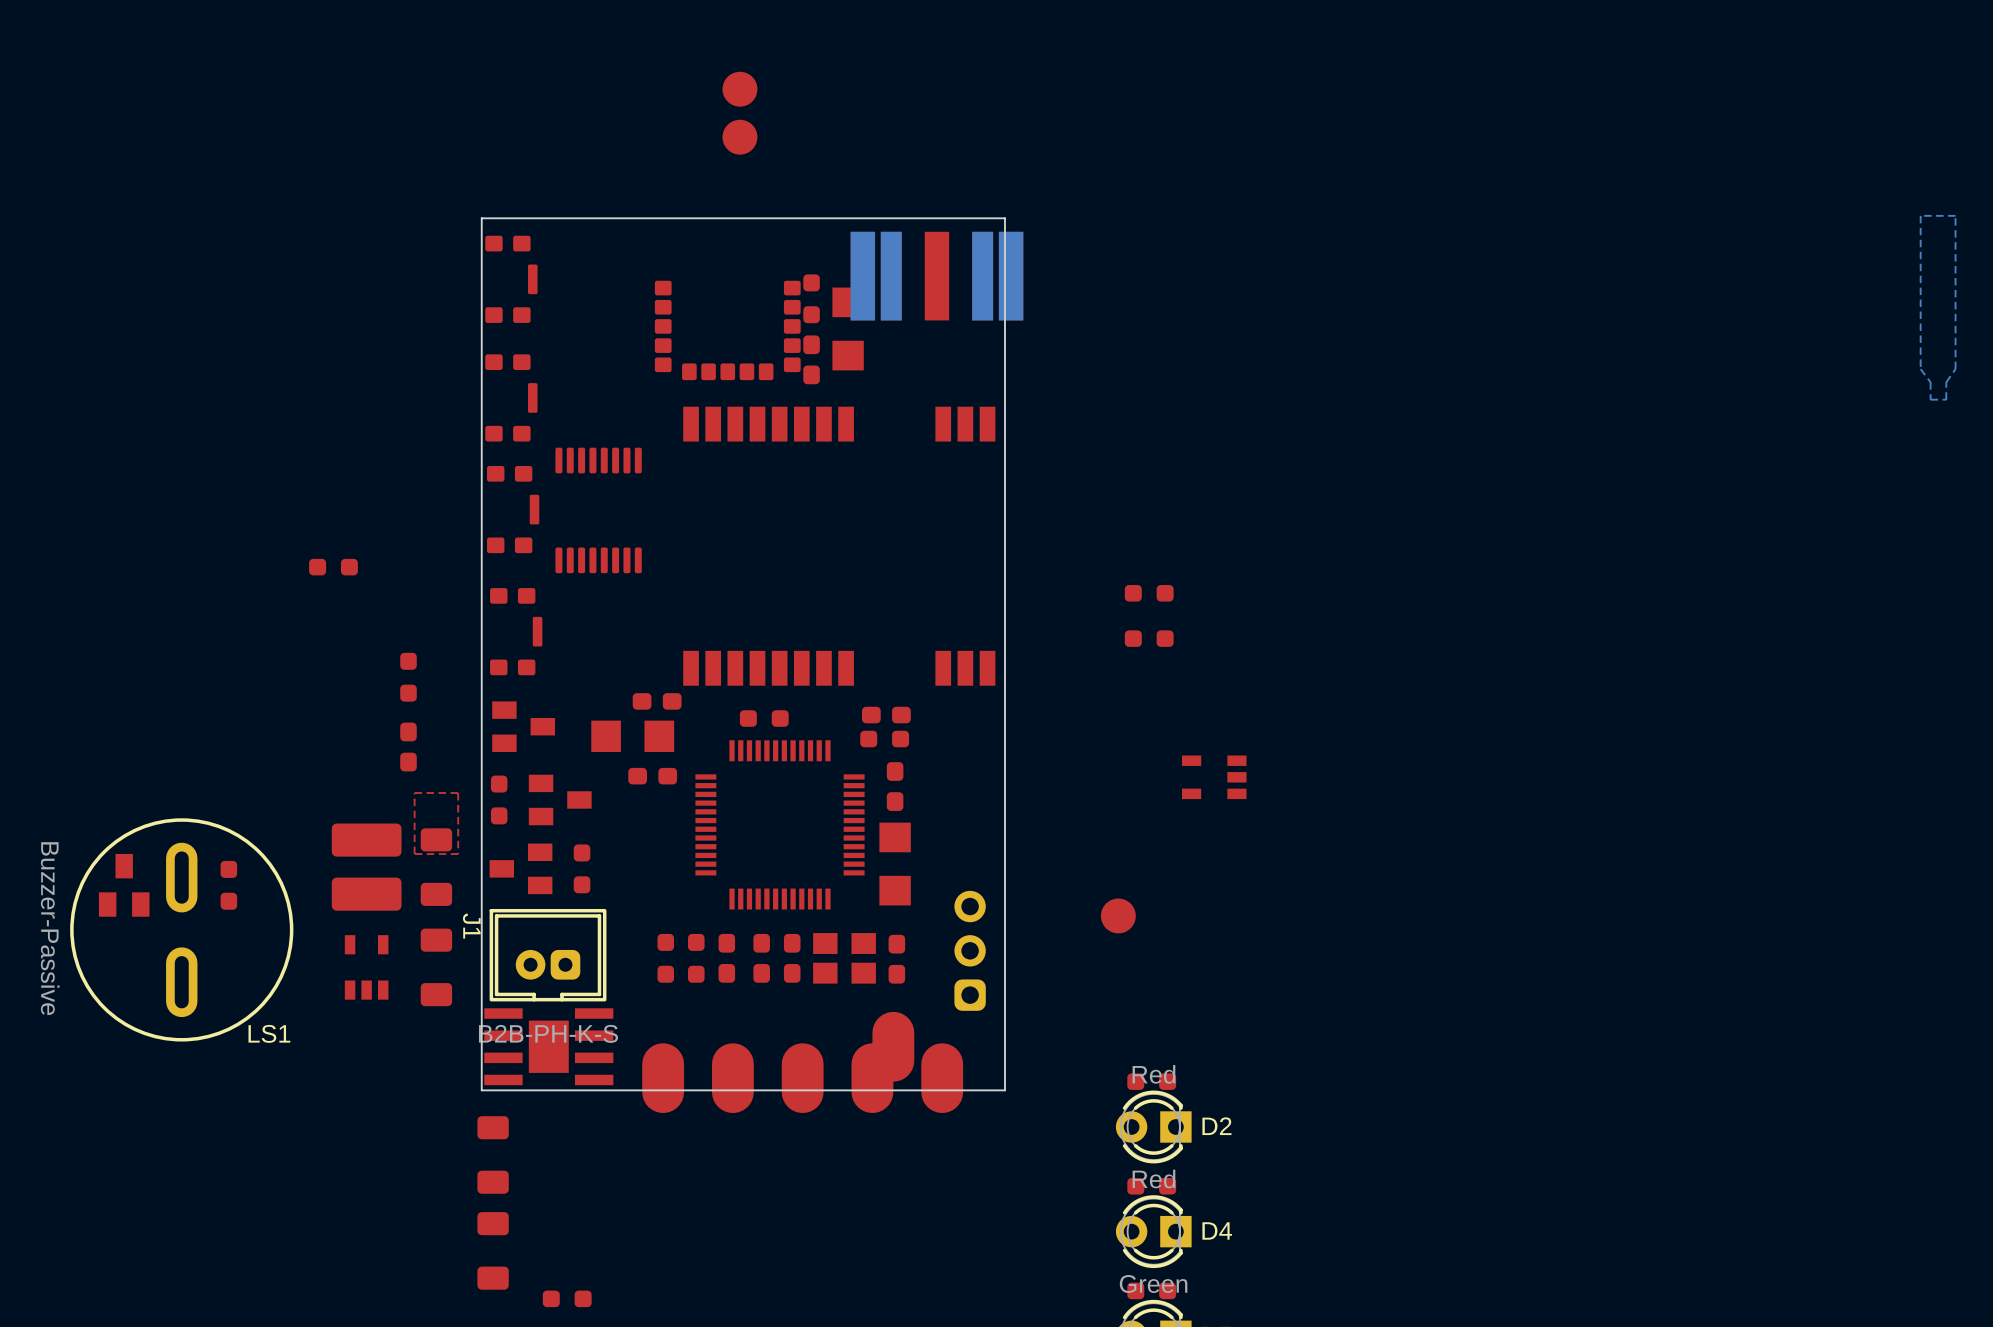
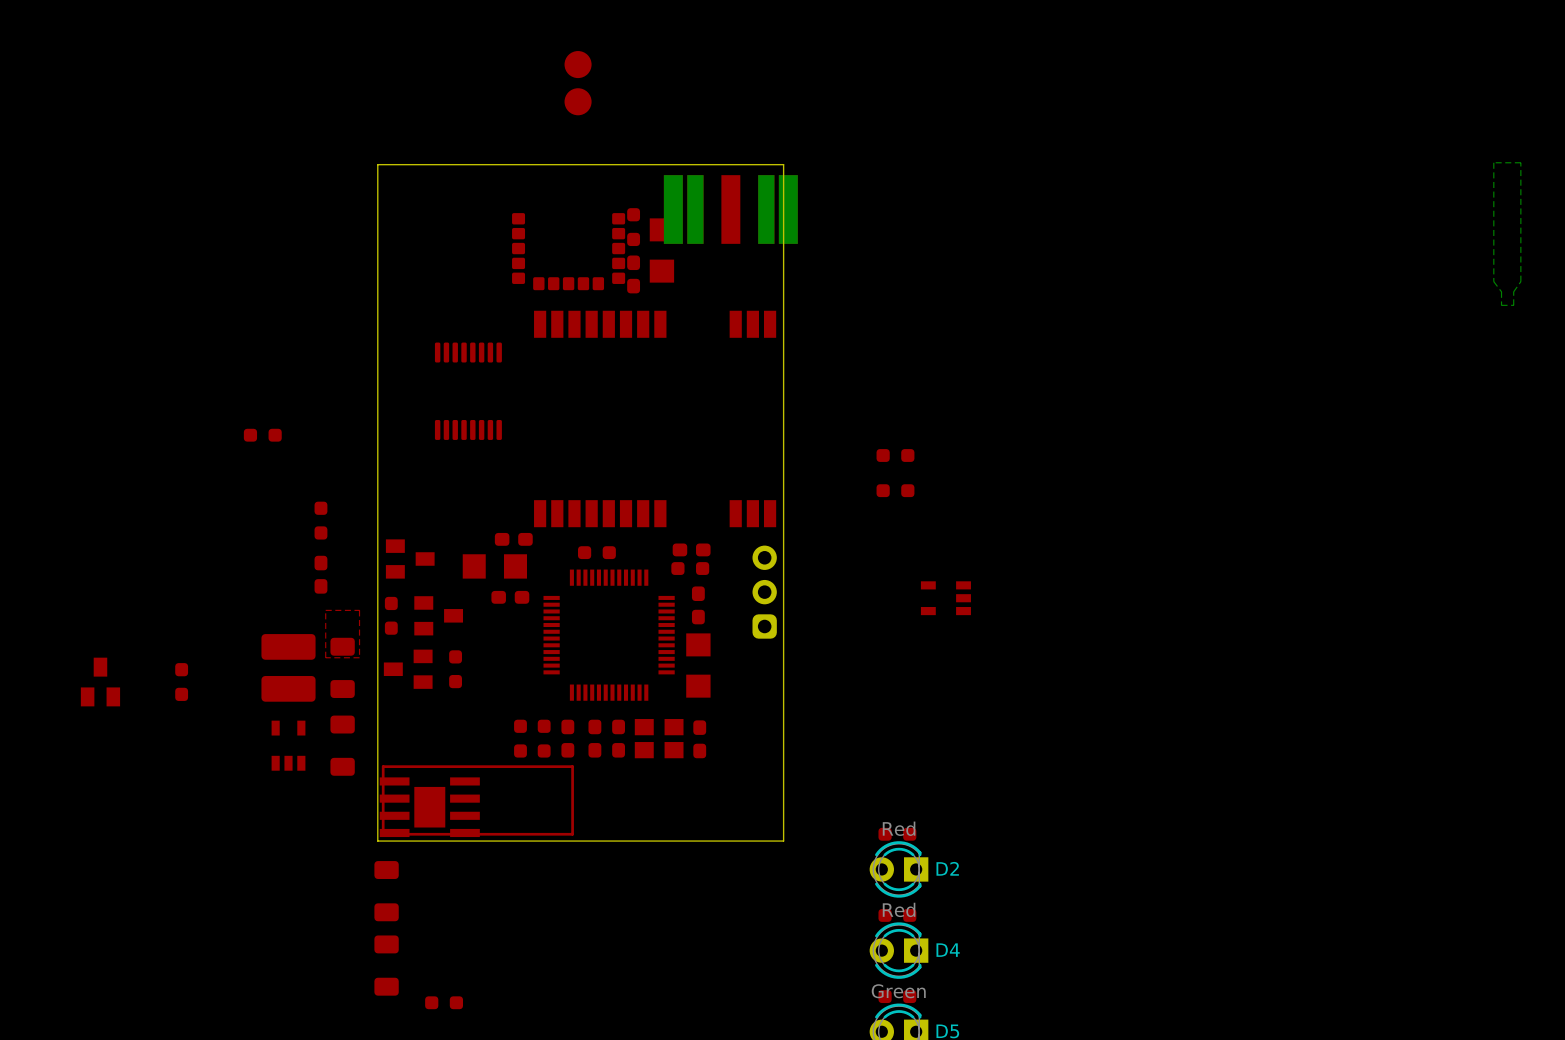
part: (511, 279) -> none
part: (511, 397) -> none
part: (513, 509) -> none
part: (516, 631) -> none
part: (1118, 915) -> none
LS1: Buzzer-Passive (181, 929) -> none
part position: (970, 950) -> (764, 592)
J1: B2B-PH-K-S (548, 955) -> none
top track: none -> (572, 766) (383, 766) (383, 834) (572, 834) (572, 766)
part: (893, 1046) -> none
part: (663, 1078) -> none
part: (732, 1078) -> none
part: (802, 1078) -> none
part: (872, 1078) -> none
part: (942, 1078) -> none

